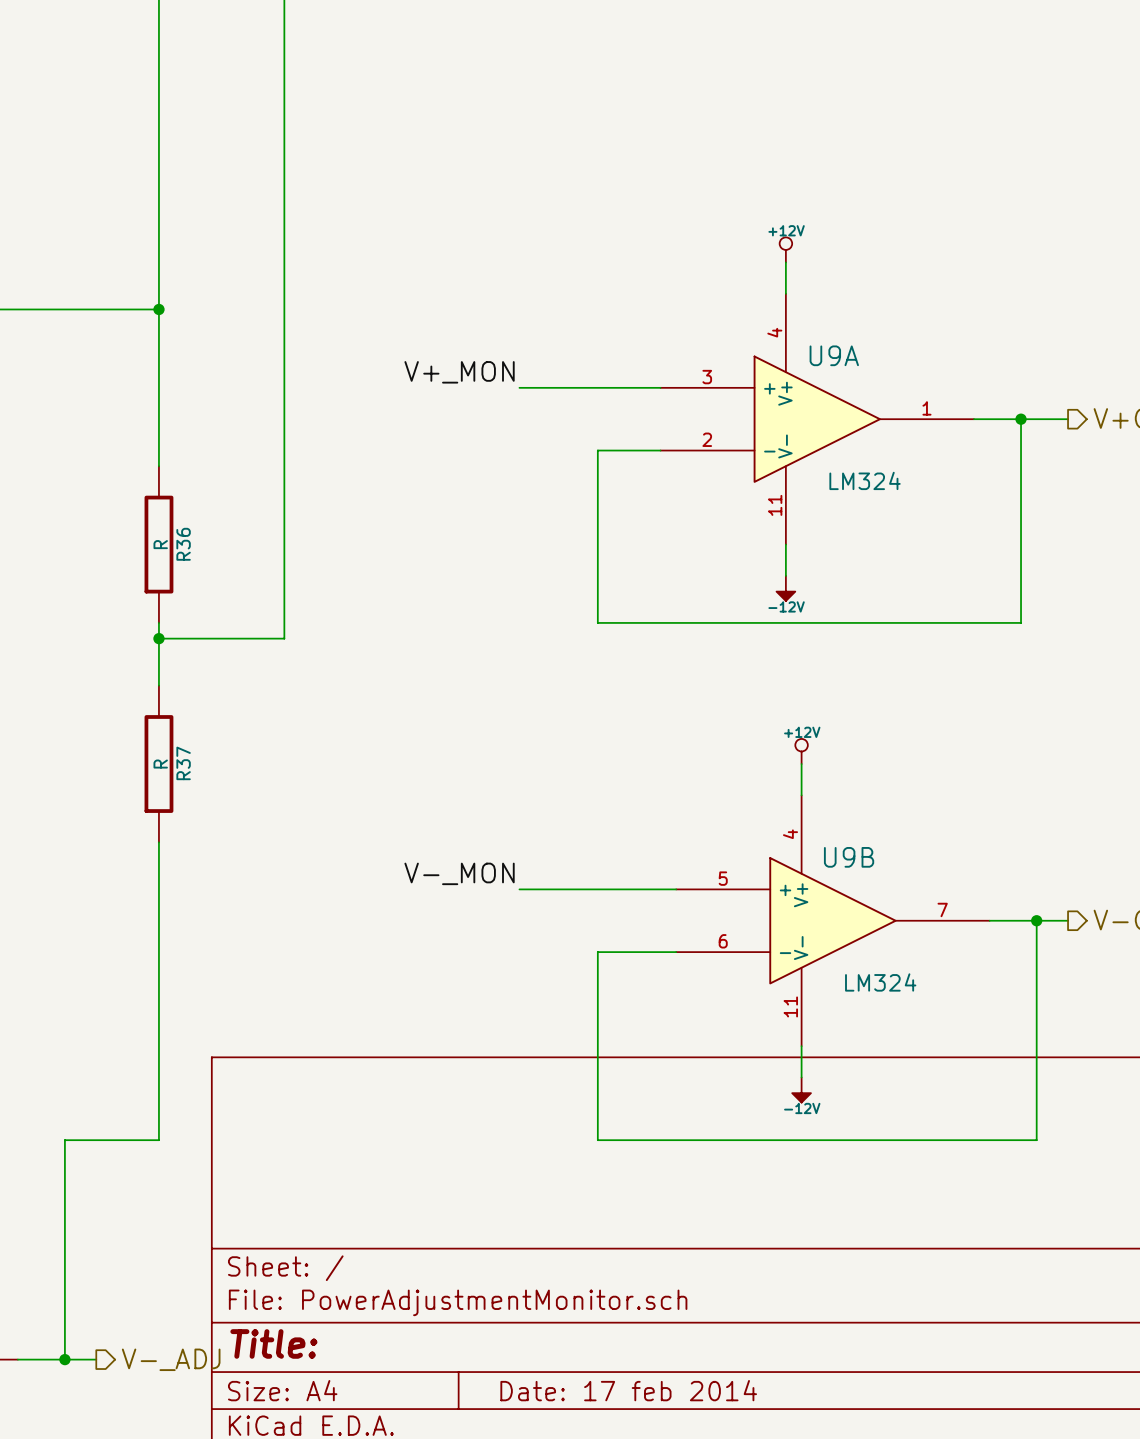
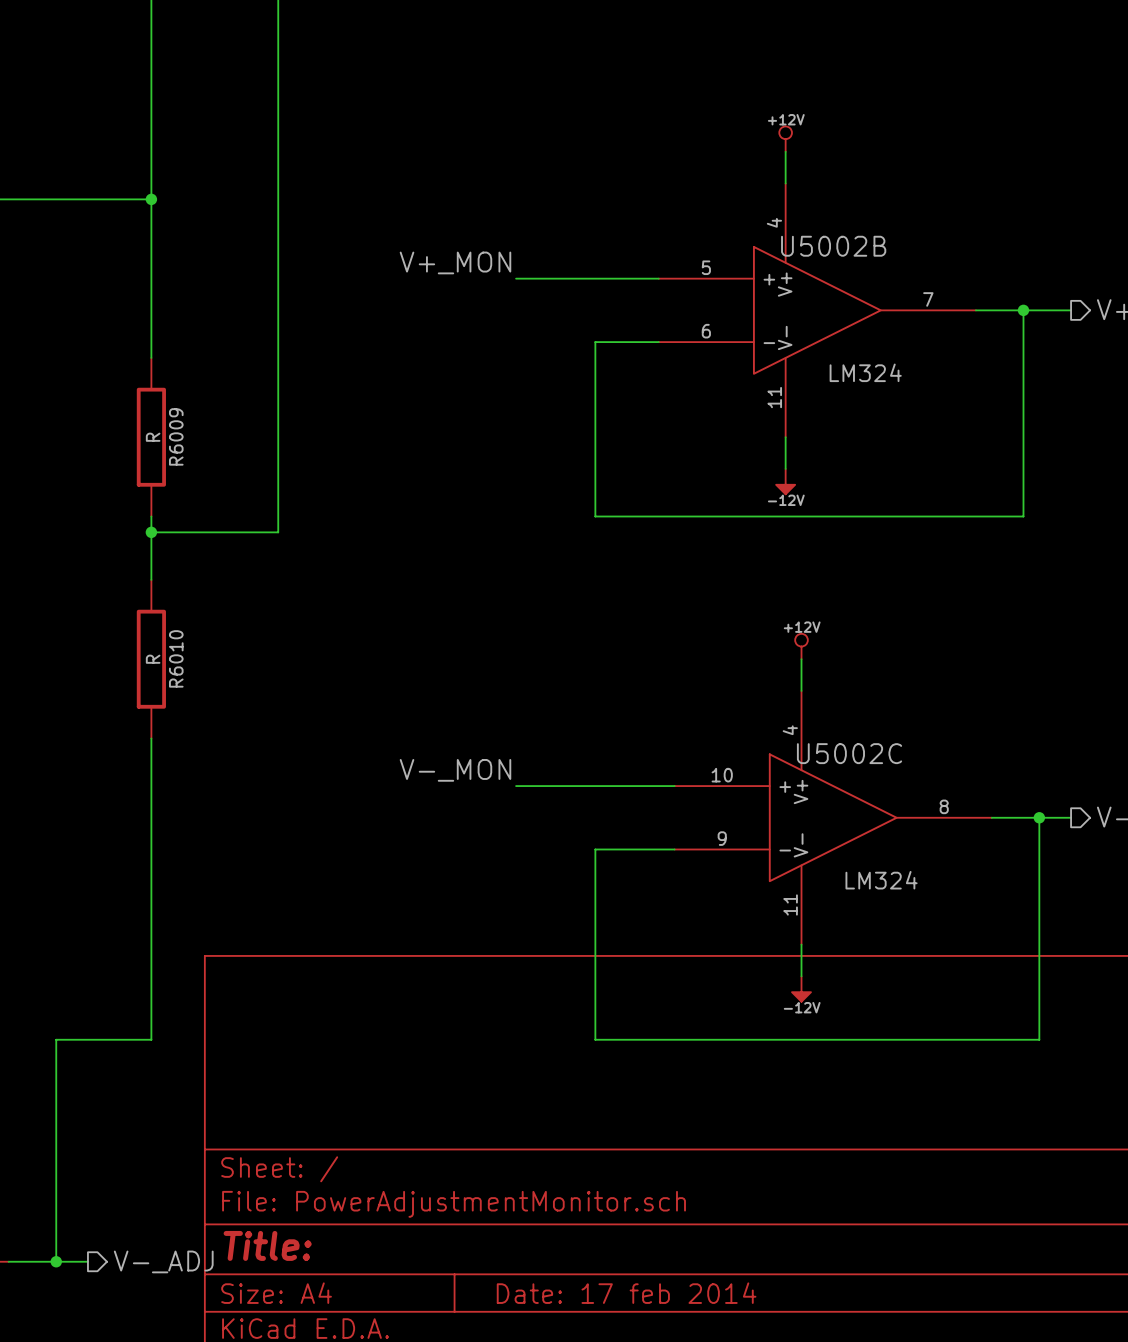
U9A name: U9A (834, 355) -> U5002B (833, 246)
U9A pin number: 3 (707, 377) -> 5 (706, 267)
U9A pin number: 1 (926, 408) -> 7 (928, 299)
U9A pin number: 2 (707, 439) -> 6 (706, 331)
R36 name: R36 (183, 544) -> R6009 (176, 436)
R37 name: R37 (183, 763) -> R6010 (176, 658)
U9B name: U9B (849, 857) -> U5002C (849, 753)
U9B pin number: 5 (723, 878) -> 10 (722, 775)
U9B pin number: 7 (942, 909) -> 8 (944, 806)
U9B pin number: 6 (723, 941) -> 9 (722, 838)

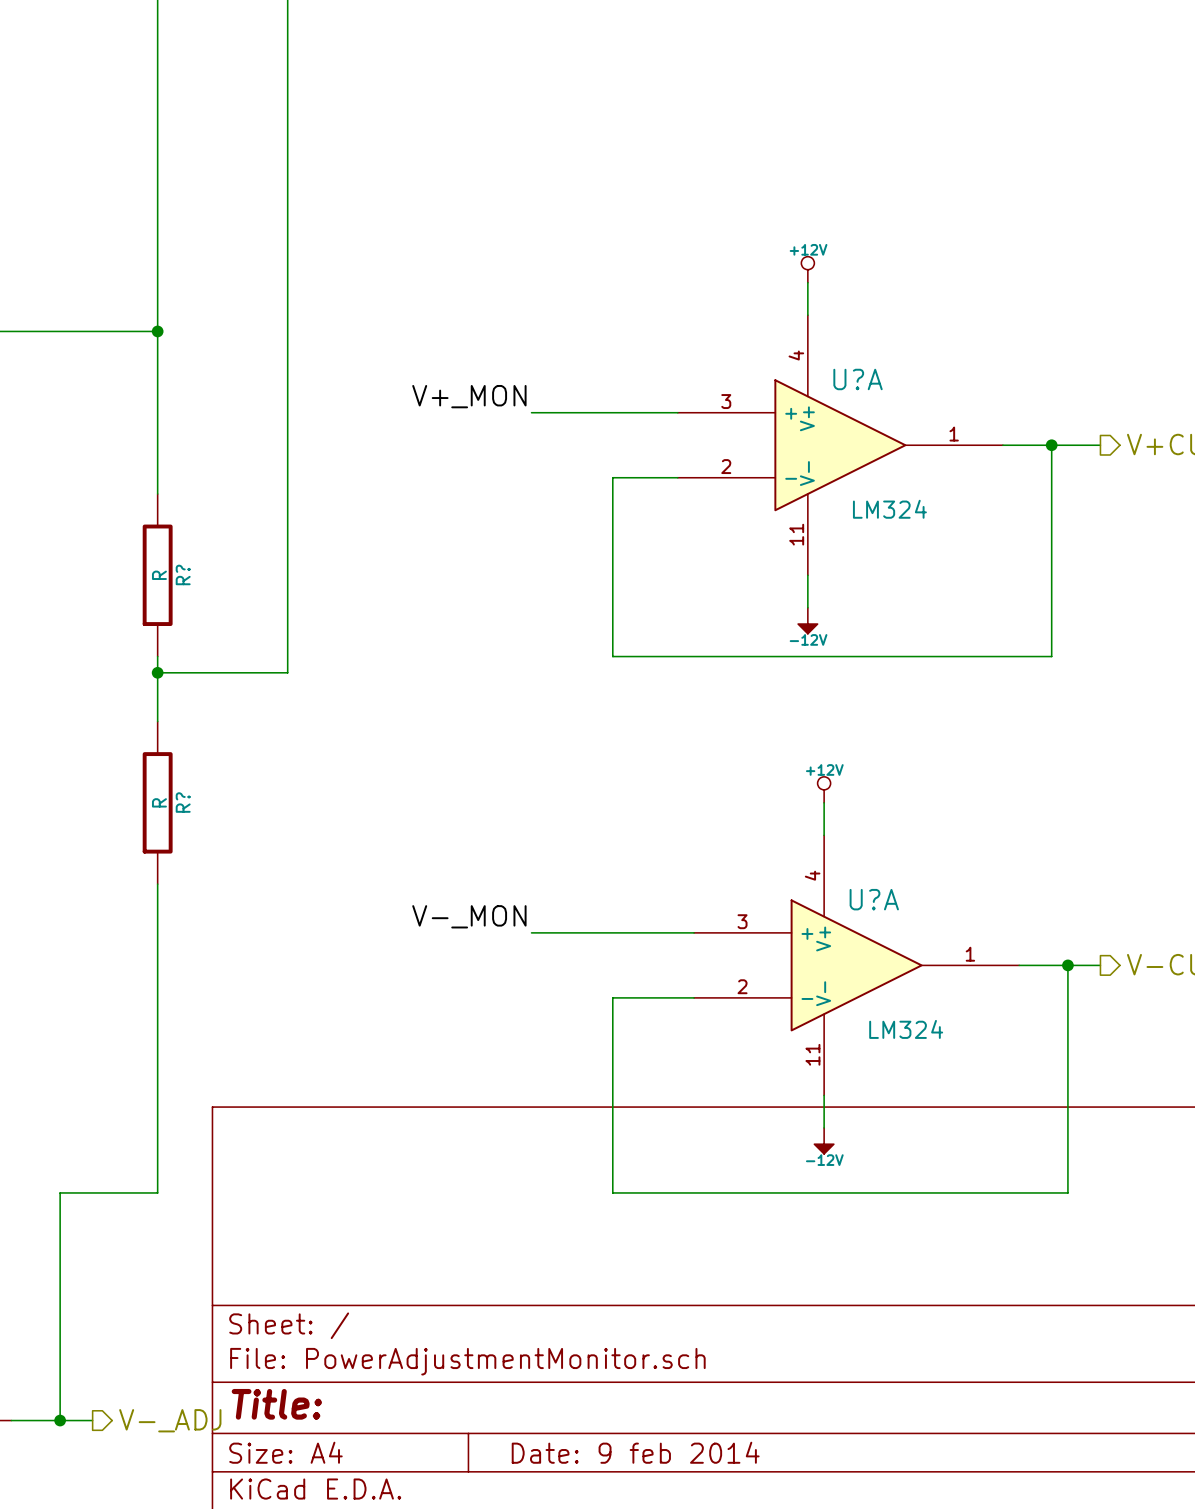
U5002B name: U5002B (833, 246) -> U?A (858, 379)
U5002B pin number: 5 (706, 267) -> 3 (726, 401)
U5002B pin number: 7 (928, 299) -> 1 (954, 434)
U5002B pin number: 6 (706, 331) -> 2 (726, 466)
R6009 name: R6009 (176, 436) -> R? (183, 574)
R6010 name: R6010 (176, 658) -> R? (183, 802)
U5002C name: U5002C (849, 753) -> U?A (874, 899)
U5002C pin number: 10 (722, 775) -> 3 (742, 921)
U5002C pin number: 8 (944, 806) -> 1 (970, 954)
U5002C pin number: 9 (722, 838) -> 2 (742, 986)
title block: Date: 17 feb 2014 (626, 1293) -> Date: 9 feb 2014 (635, 1452)

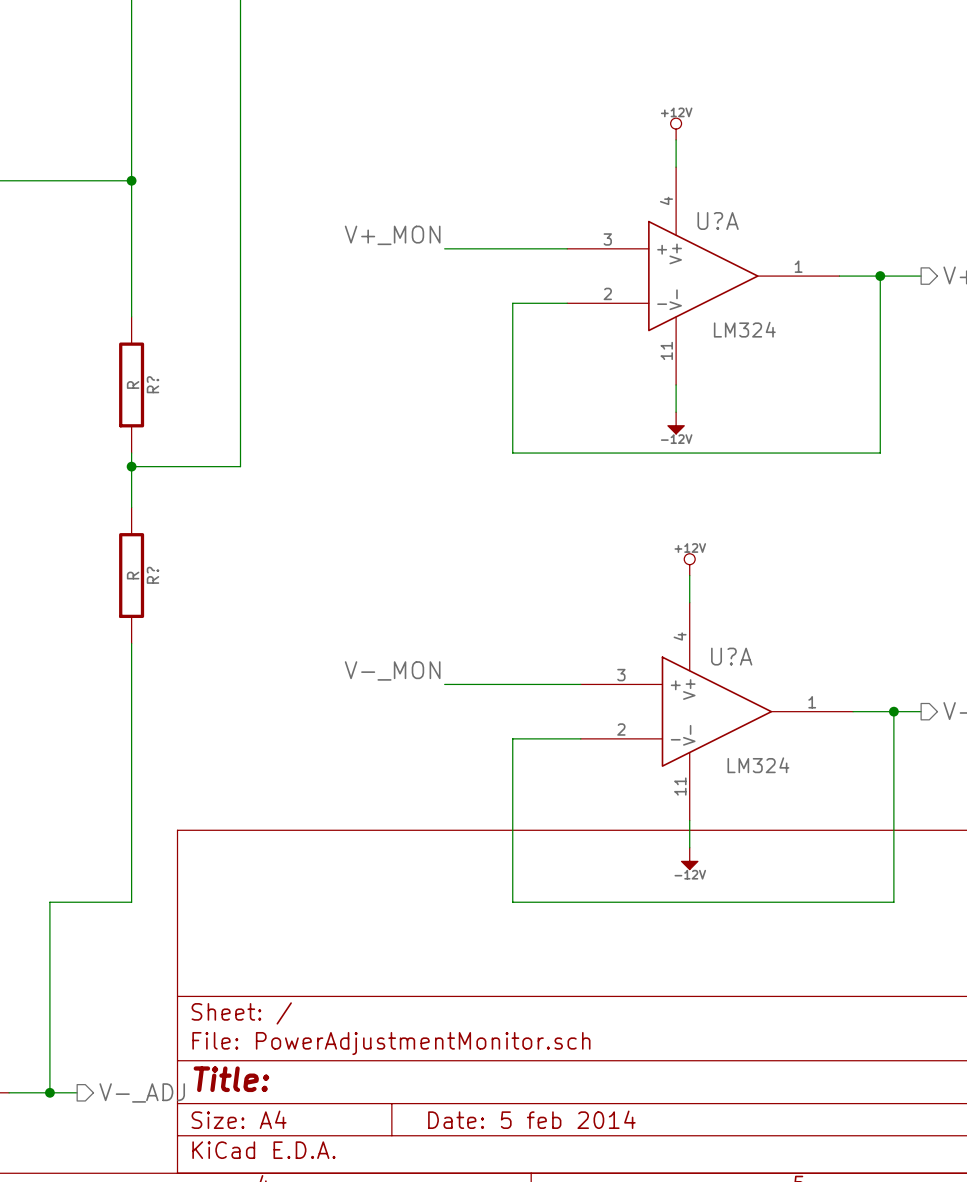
title block: Date: 9 feb 2014 (635, 1452) -> Date: 5 feb 2014 (531, 1119)

